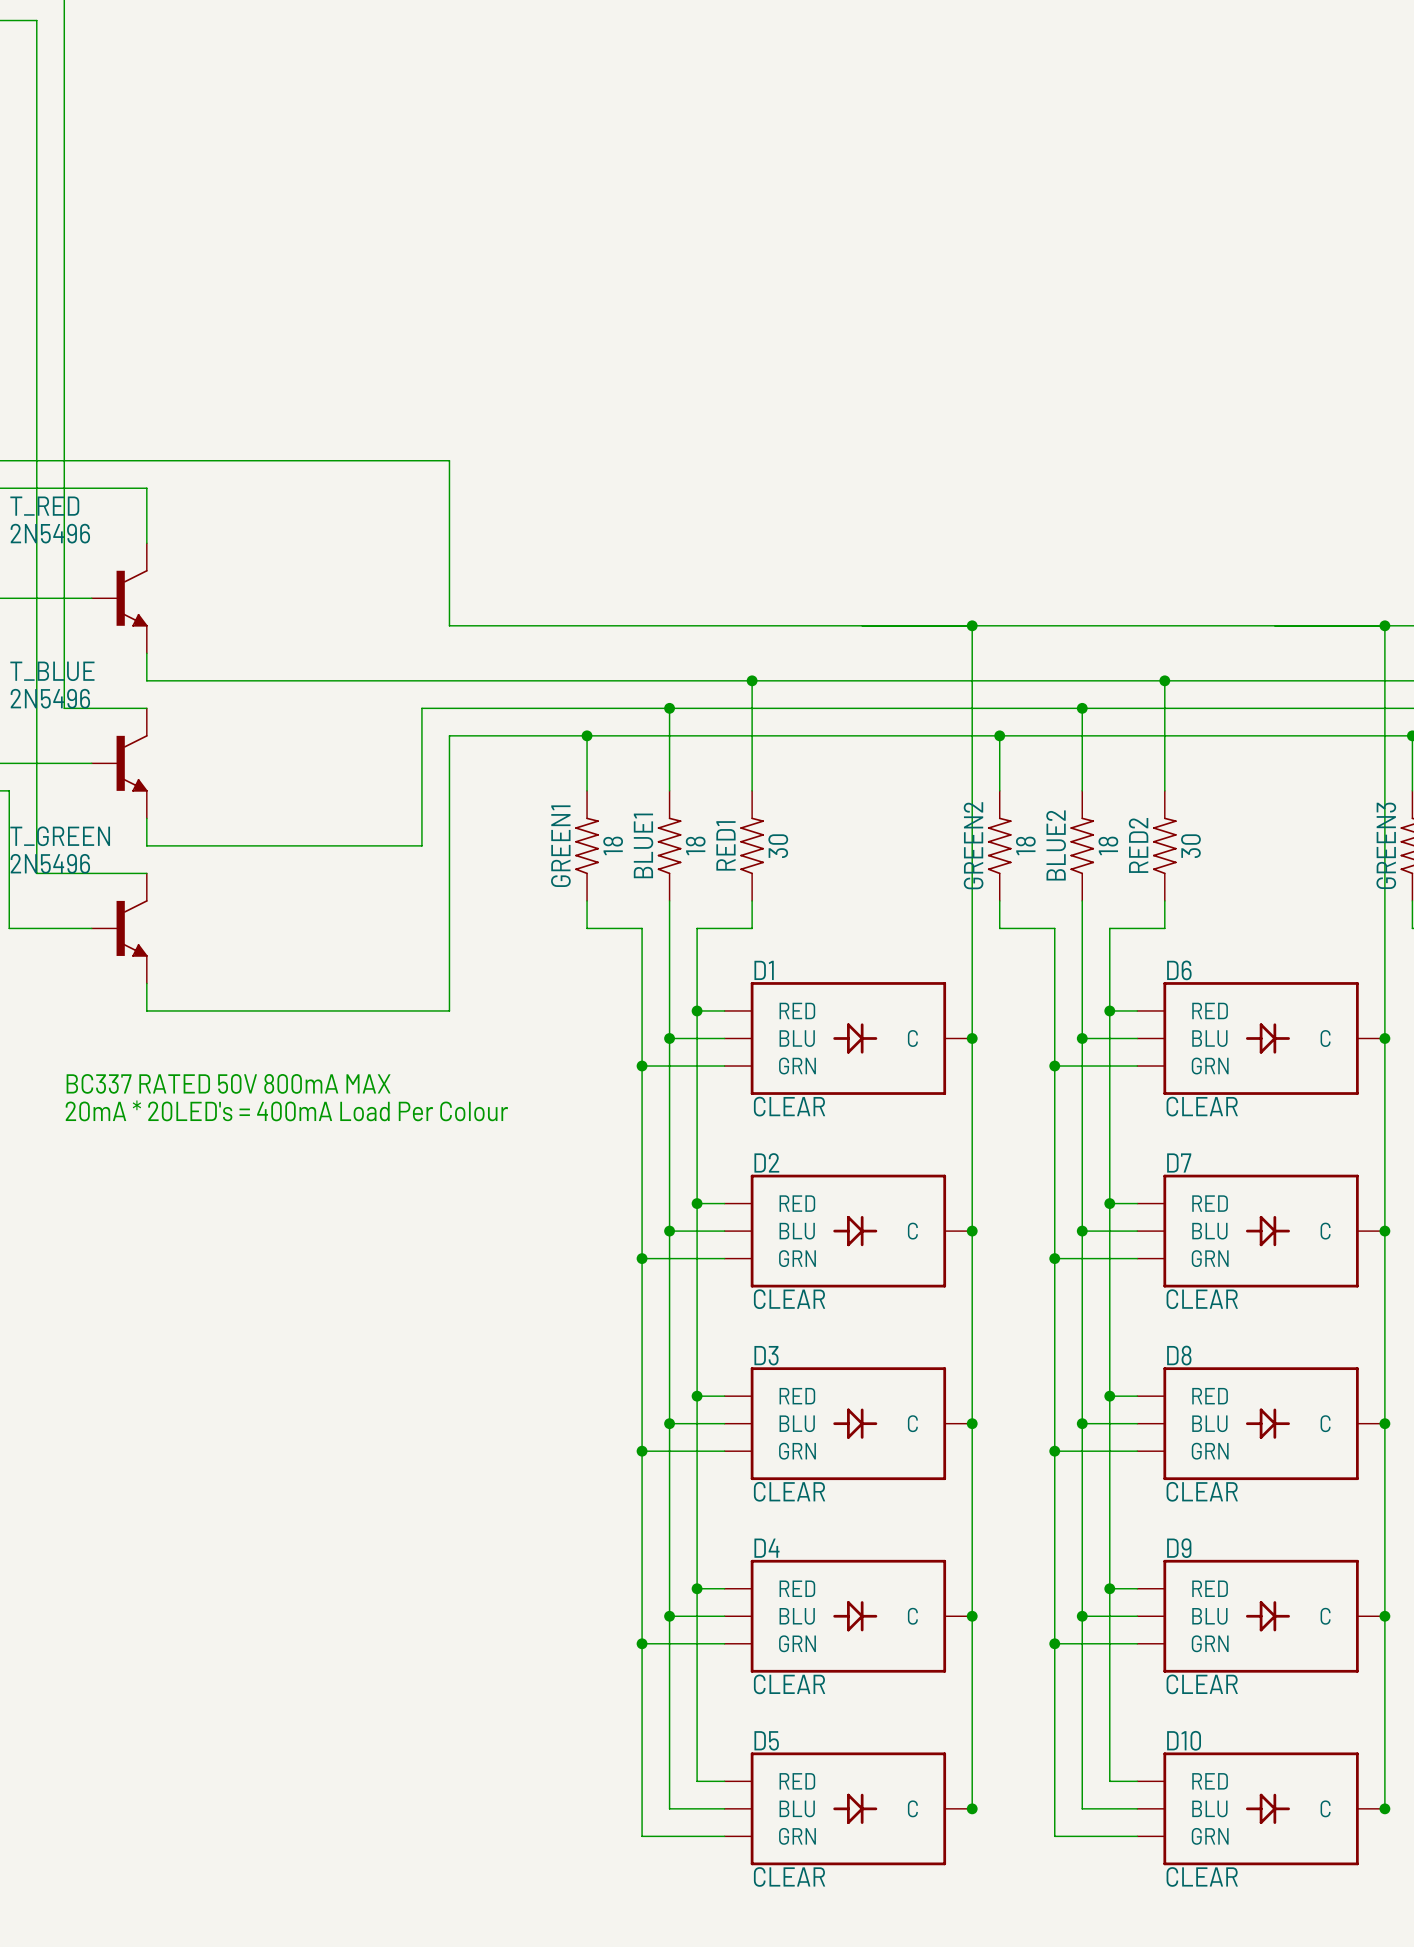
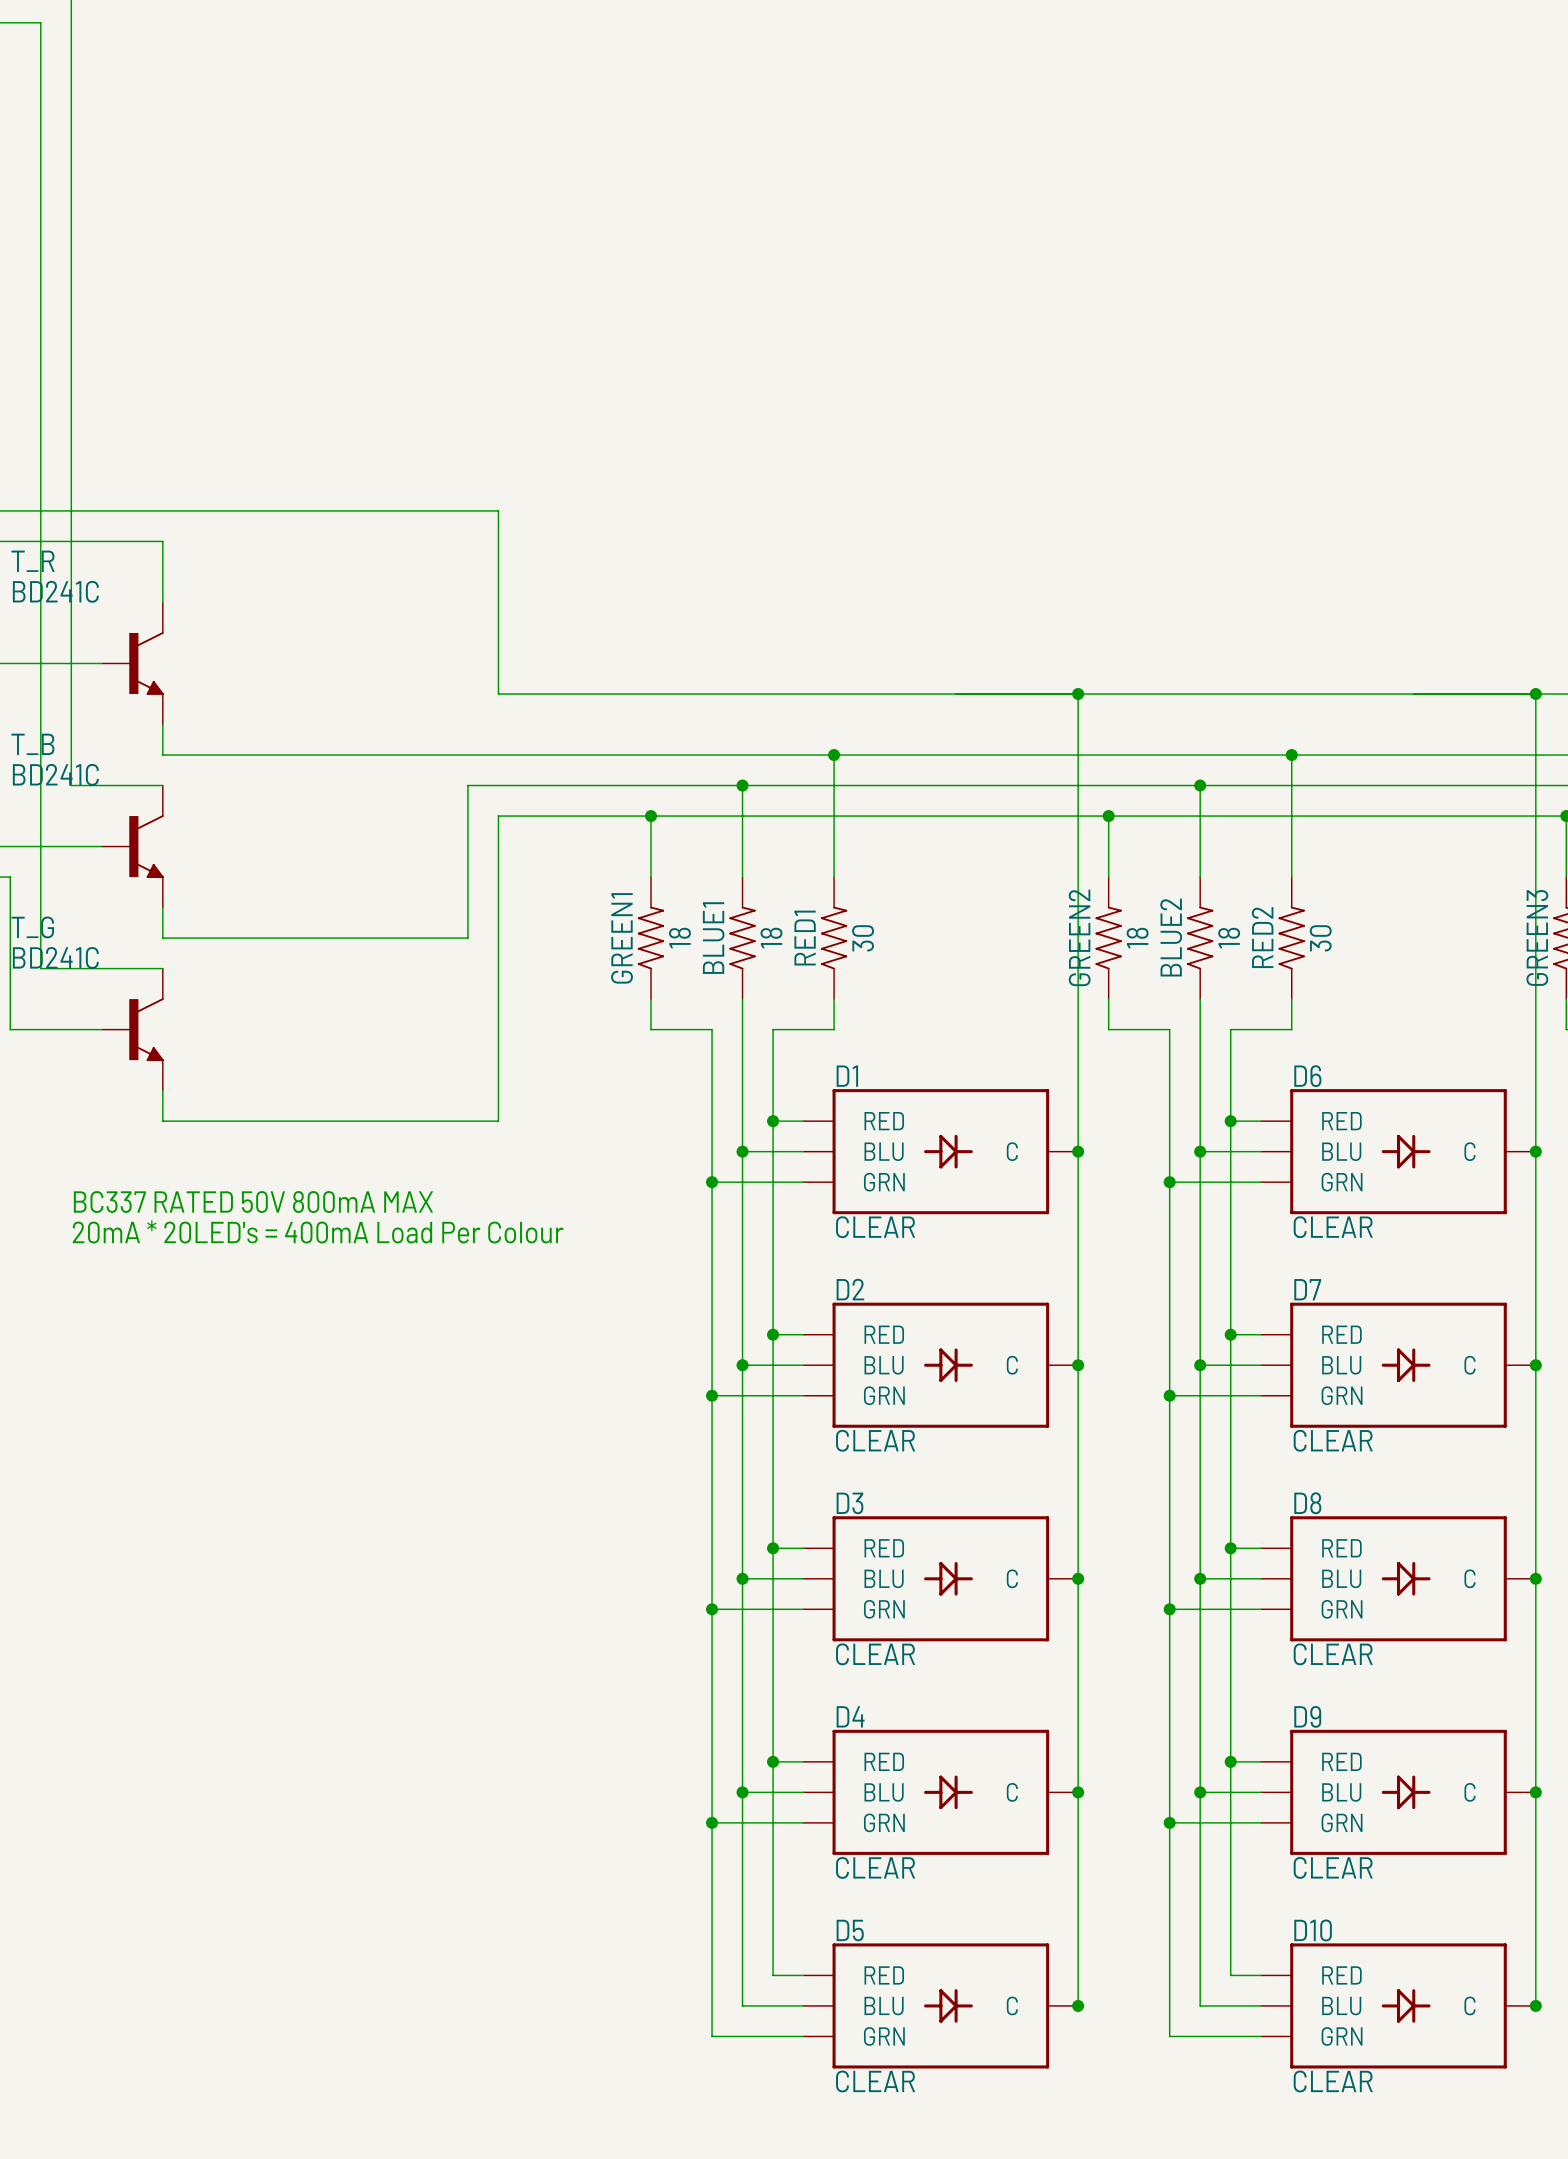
T_RED name: T_RED (44, 506) -> T_R (33, 561)
T_RED value: 2N5496 (50, 533) -> BD241C (55, 591)
T_BLUE name: T_BLUE (52, 671) -> T_B (32, 744)
T_BLUE value: 2N5496 (50, 698) -> BD241C (55, 774)
T_GREEN name: T_GREEN (60, 836) -> T_G (32, 927)
T_GREEN value: 2N5496 (50, 863) -> BD241C (55, 957)

